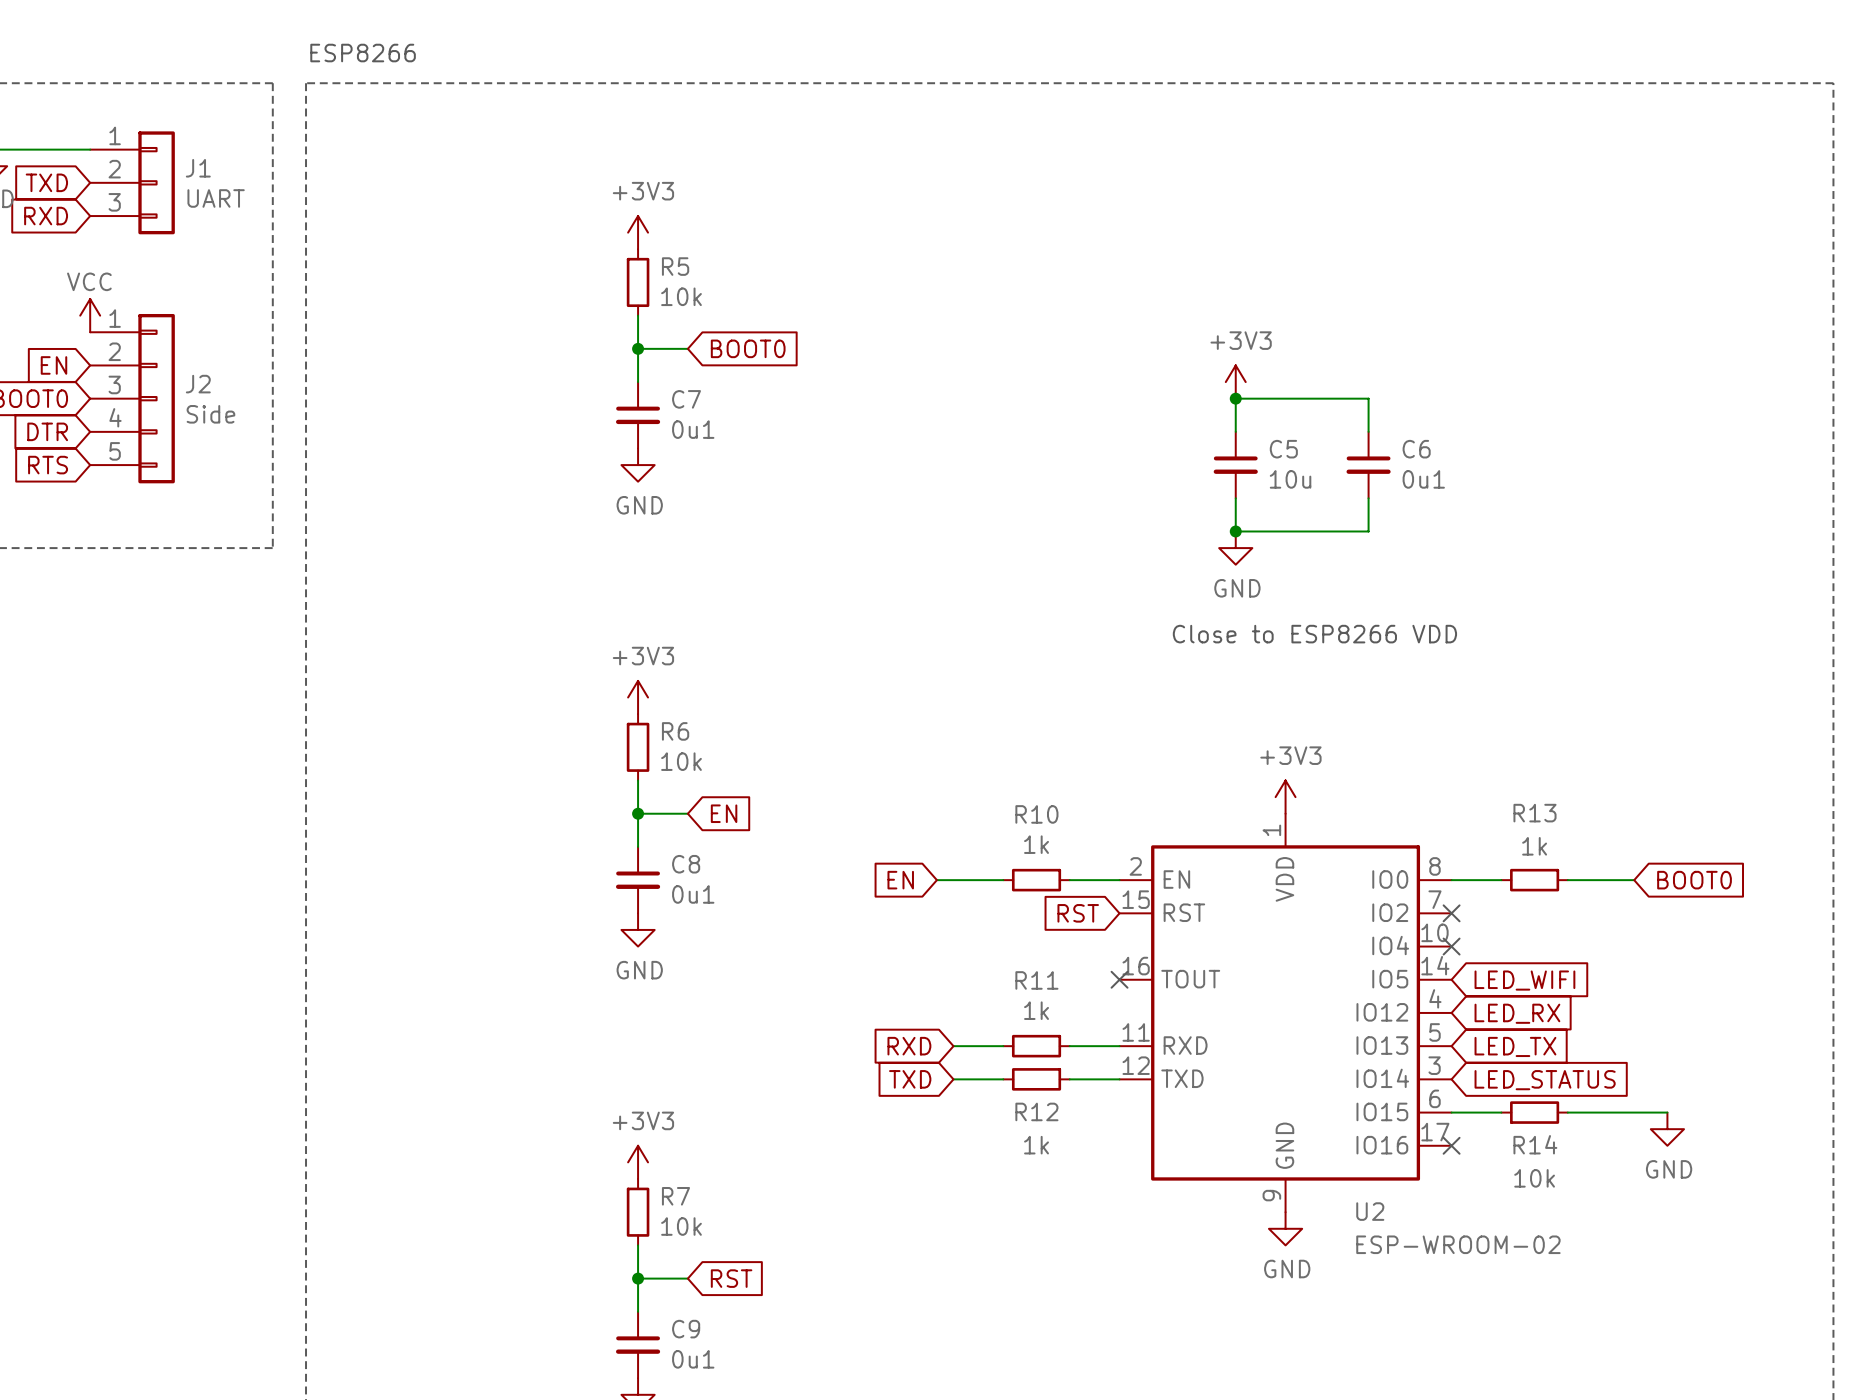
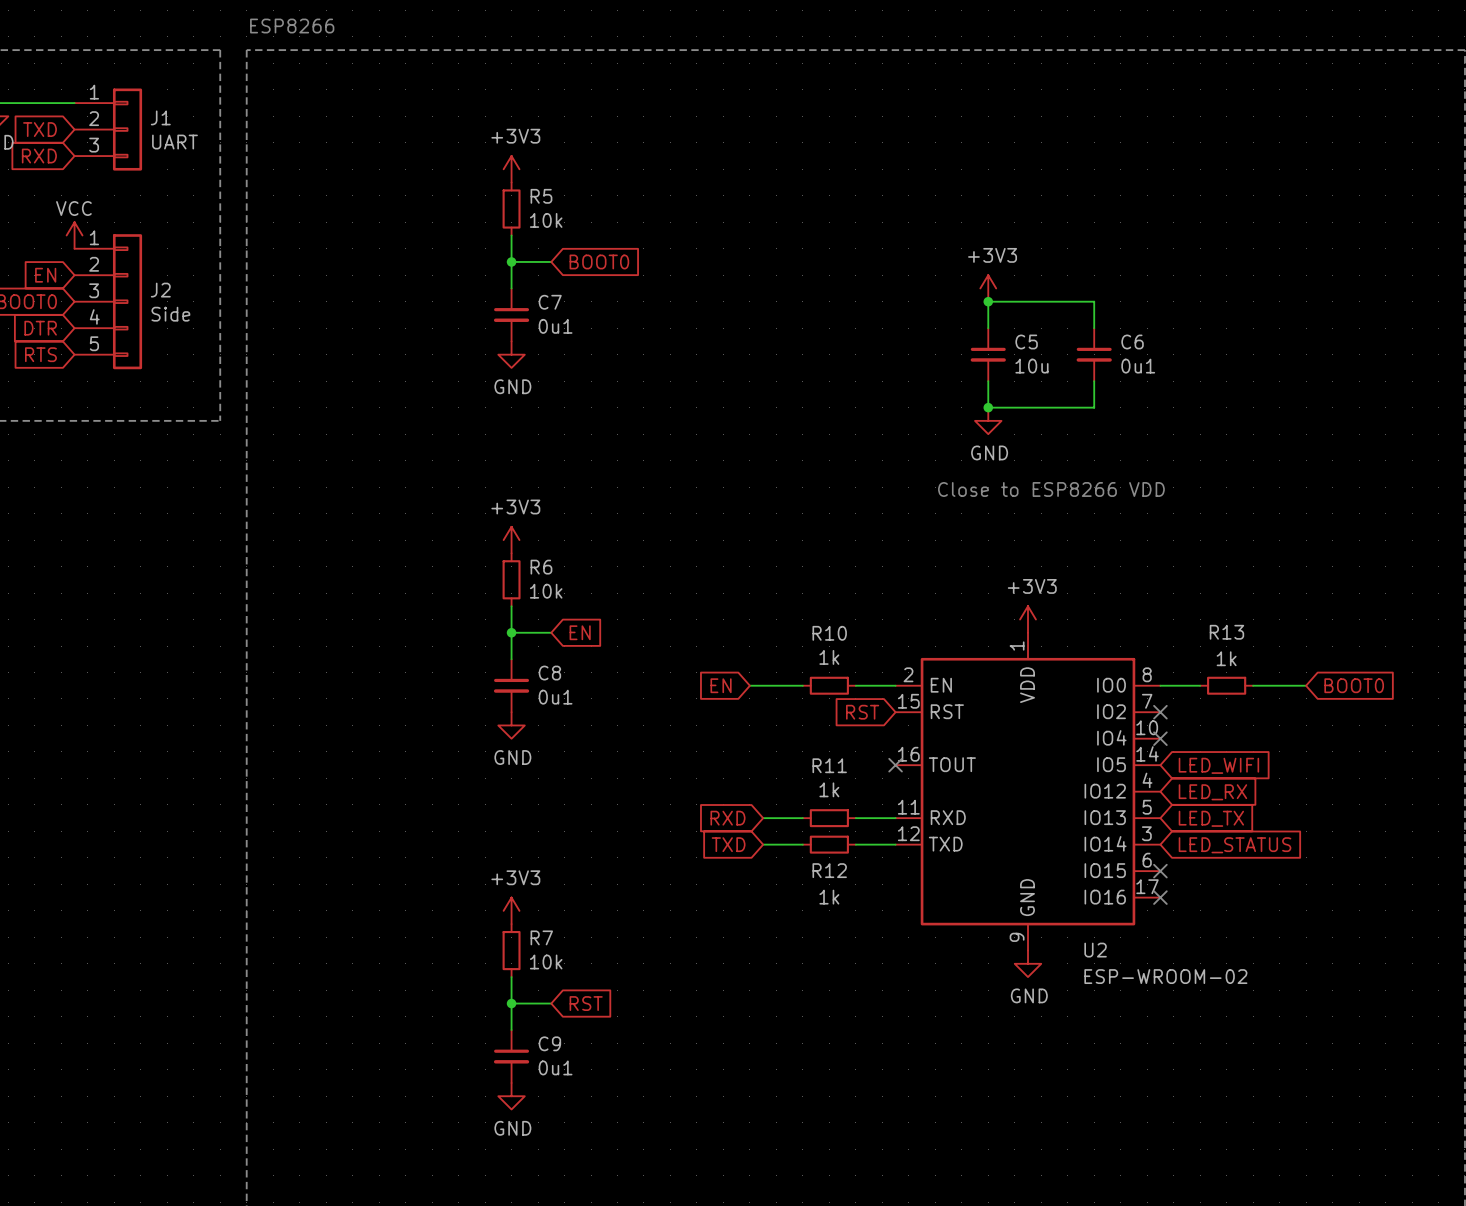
wire: (1451, 1112) (1501, 1112) -> none
no-connect mark: none -> (1160, 871)
R14: 10k (1534, 1112) -> none
wire: (1567, 1112) (1667, 1112) -> none
power symbol: GND (1667, 1129) -> none

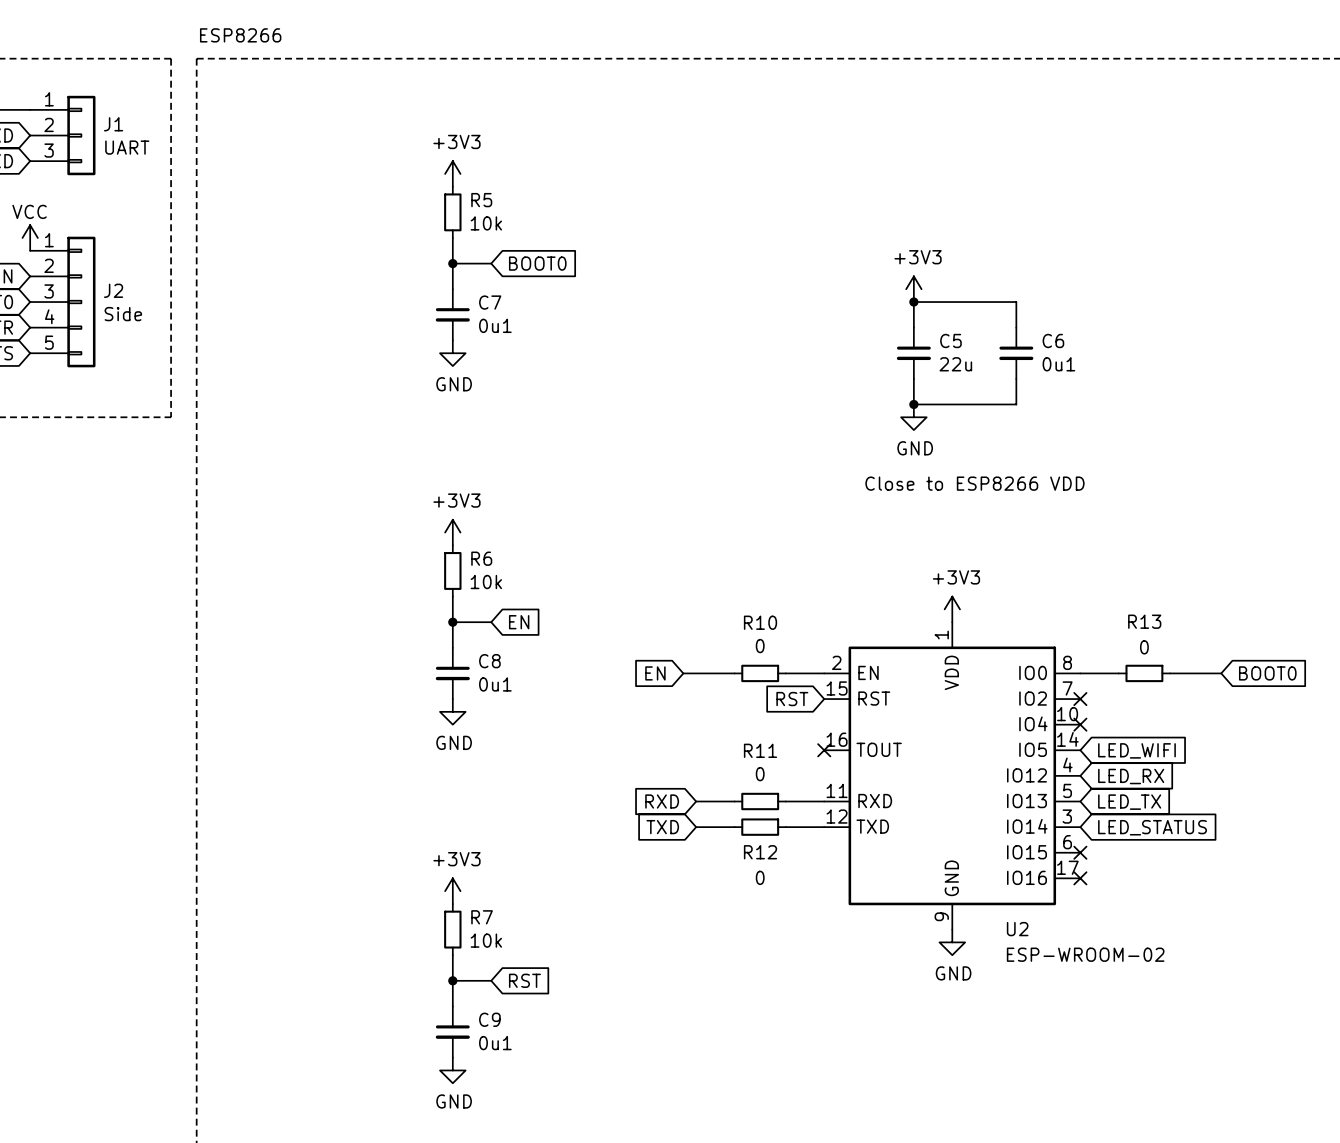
C5 value: 10u (1031, 366) -> 22u (955, 364)
R10 value: 1k (829, 657) -> 0 (760, 646)
R13 value: 1k (1226, 658) -> 0 (1144, 647)
R11 value: 1k (829, 789) -> 0 (760, 774)
R12 value: 1k (829, 897) -> 0 (760, 877)

